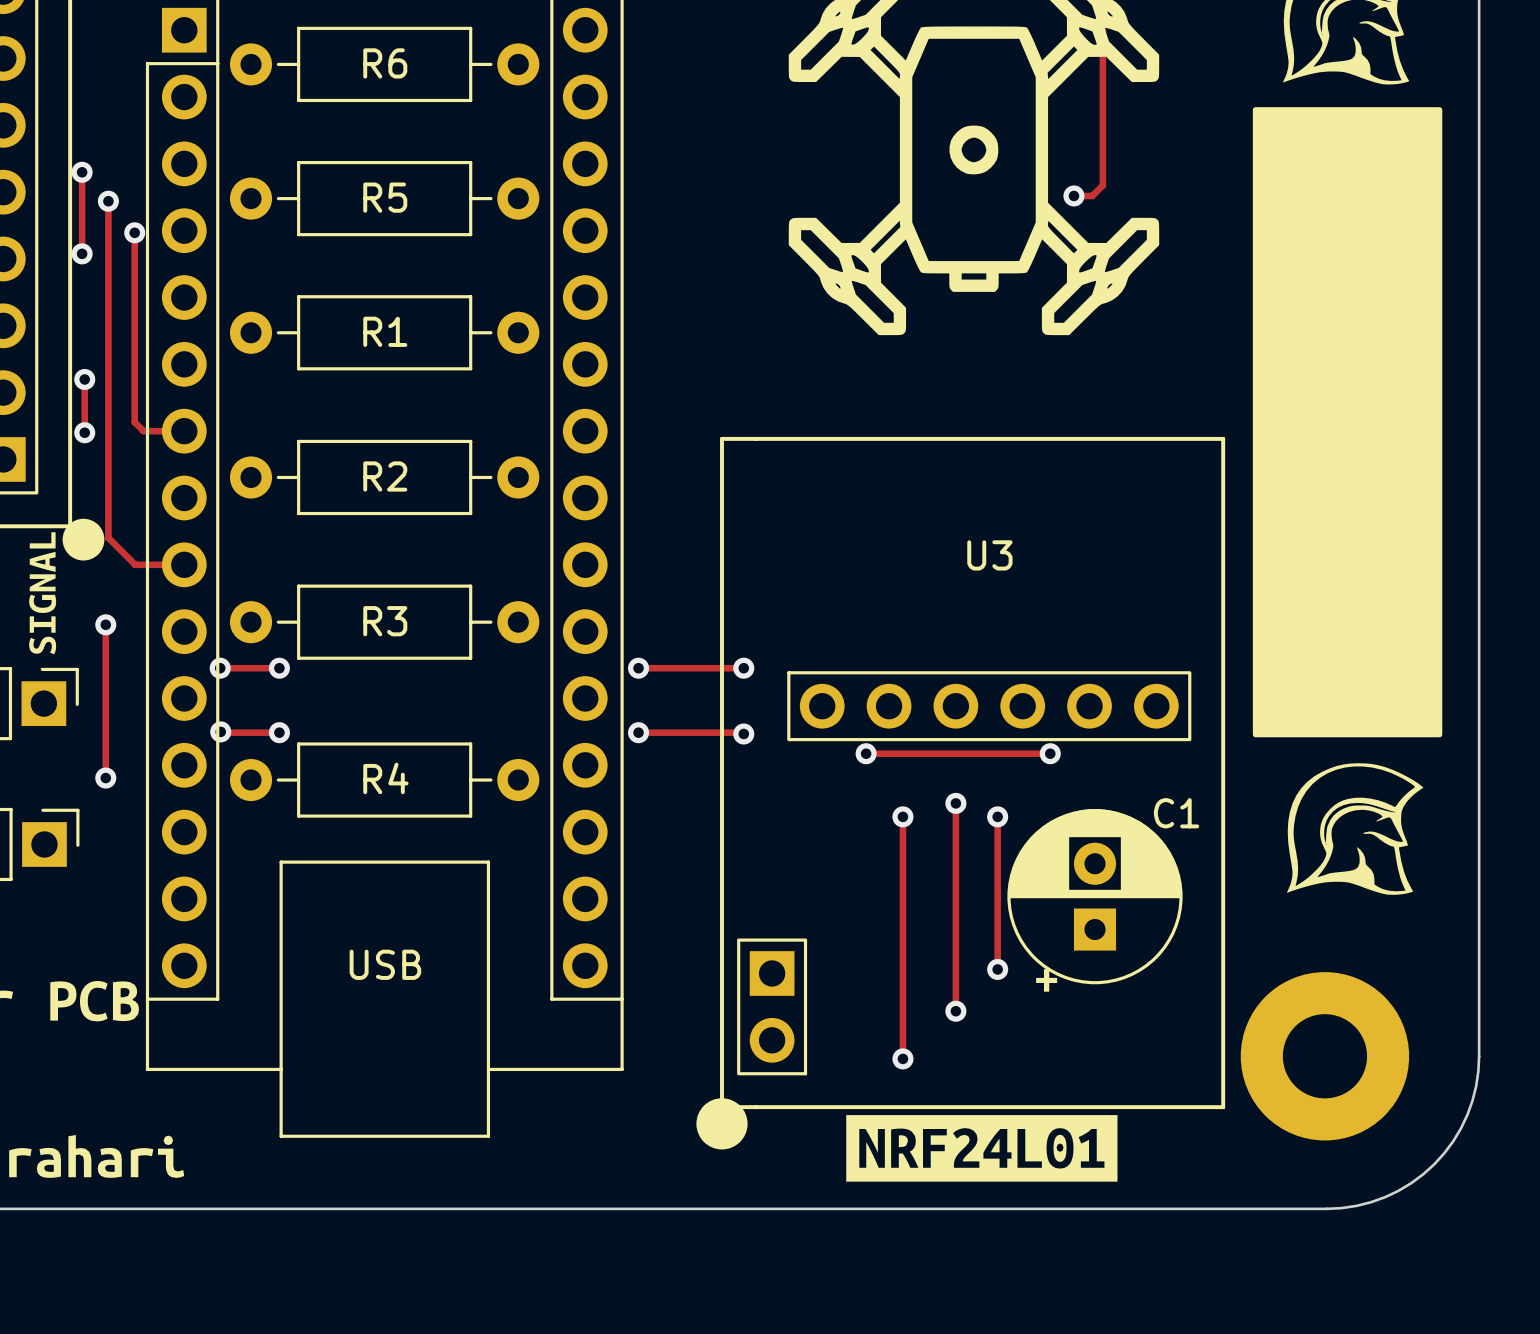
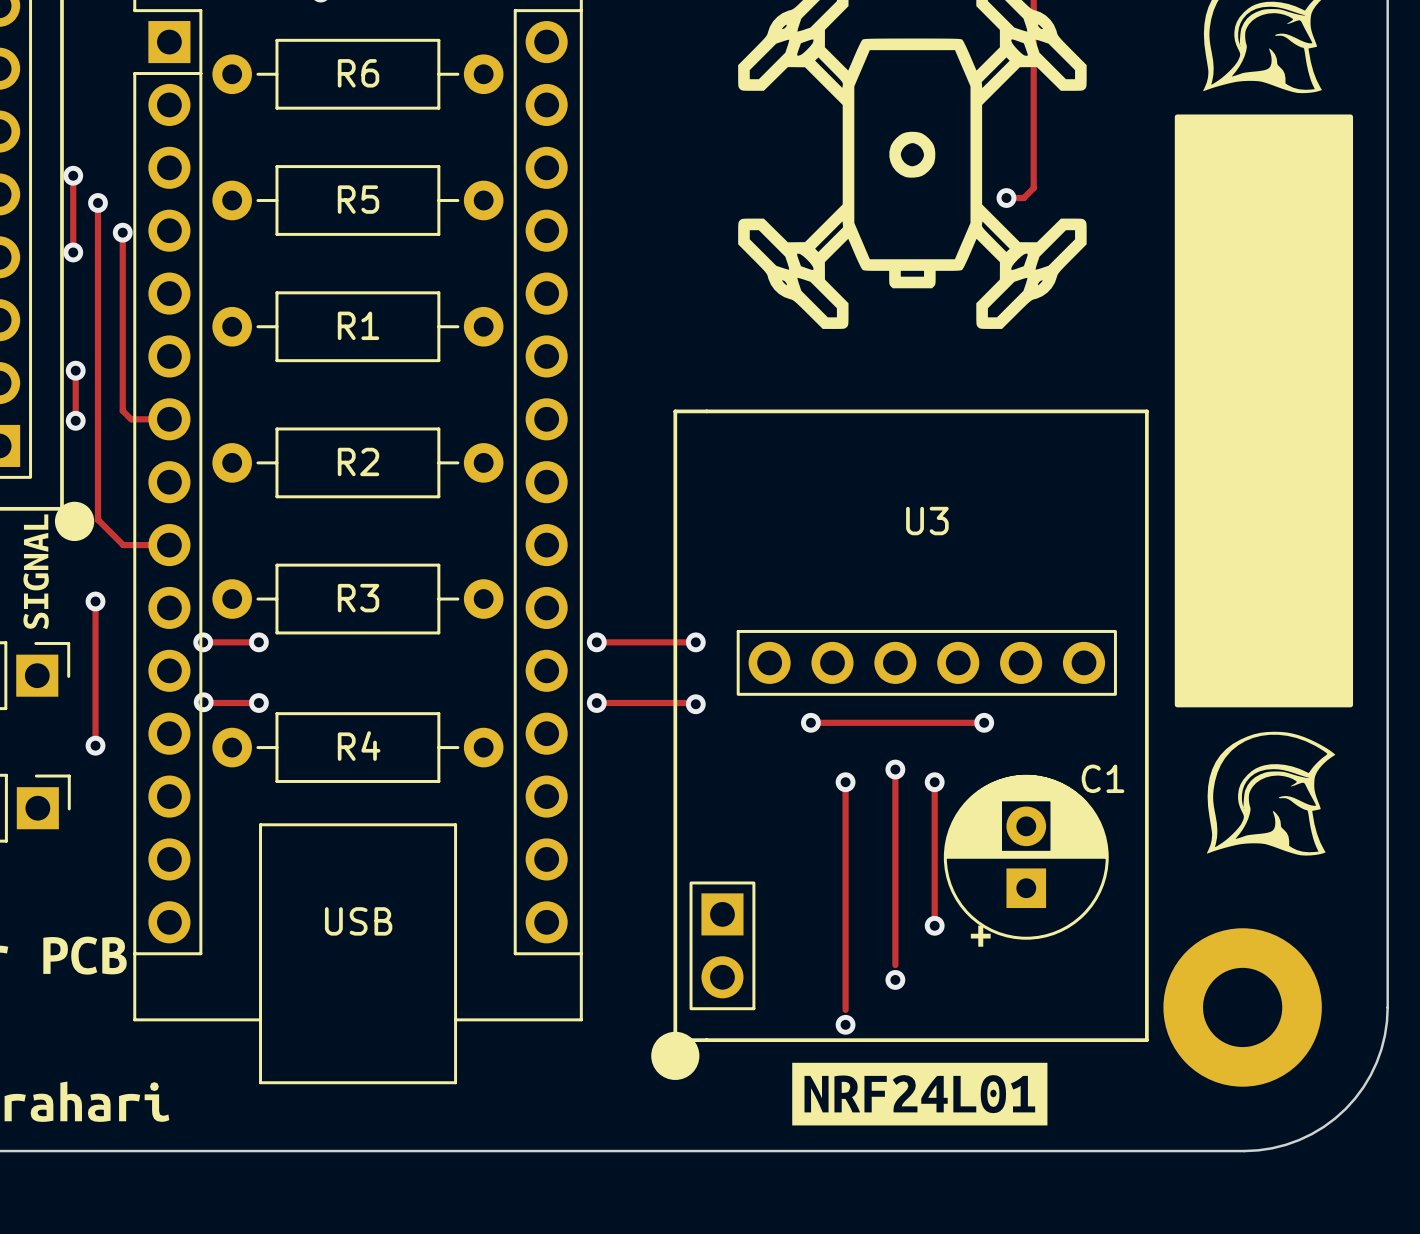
U3 position: (960, 793) -> (899, 744)
via position: (955, 1011) -> (895, 979)
via position: (902, 1058) -> (845, 1024)

